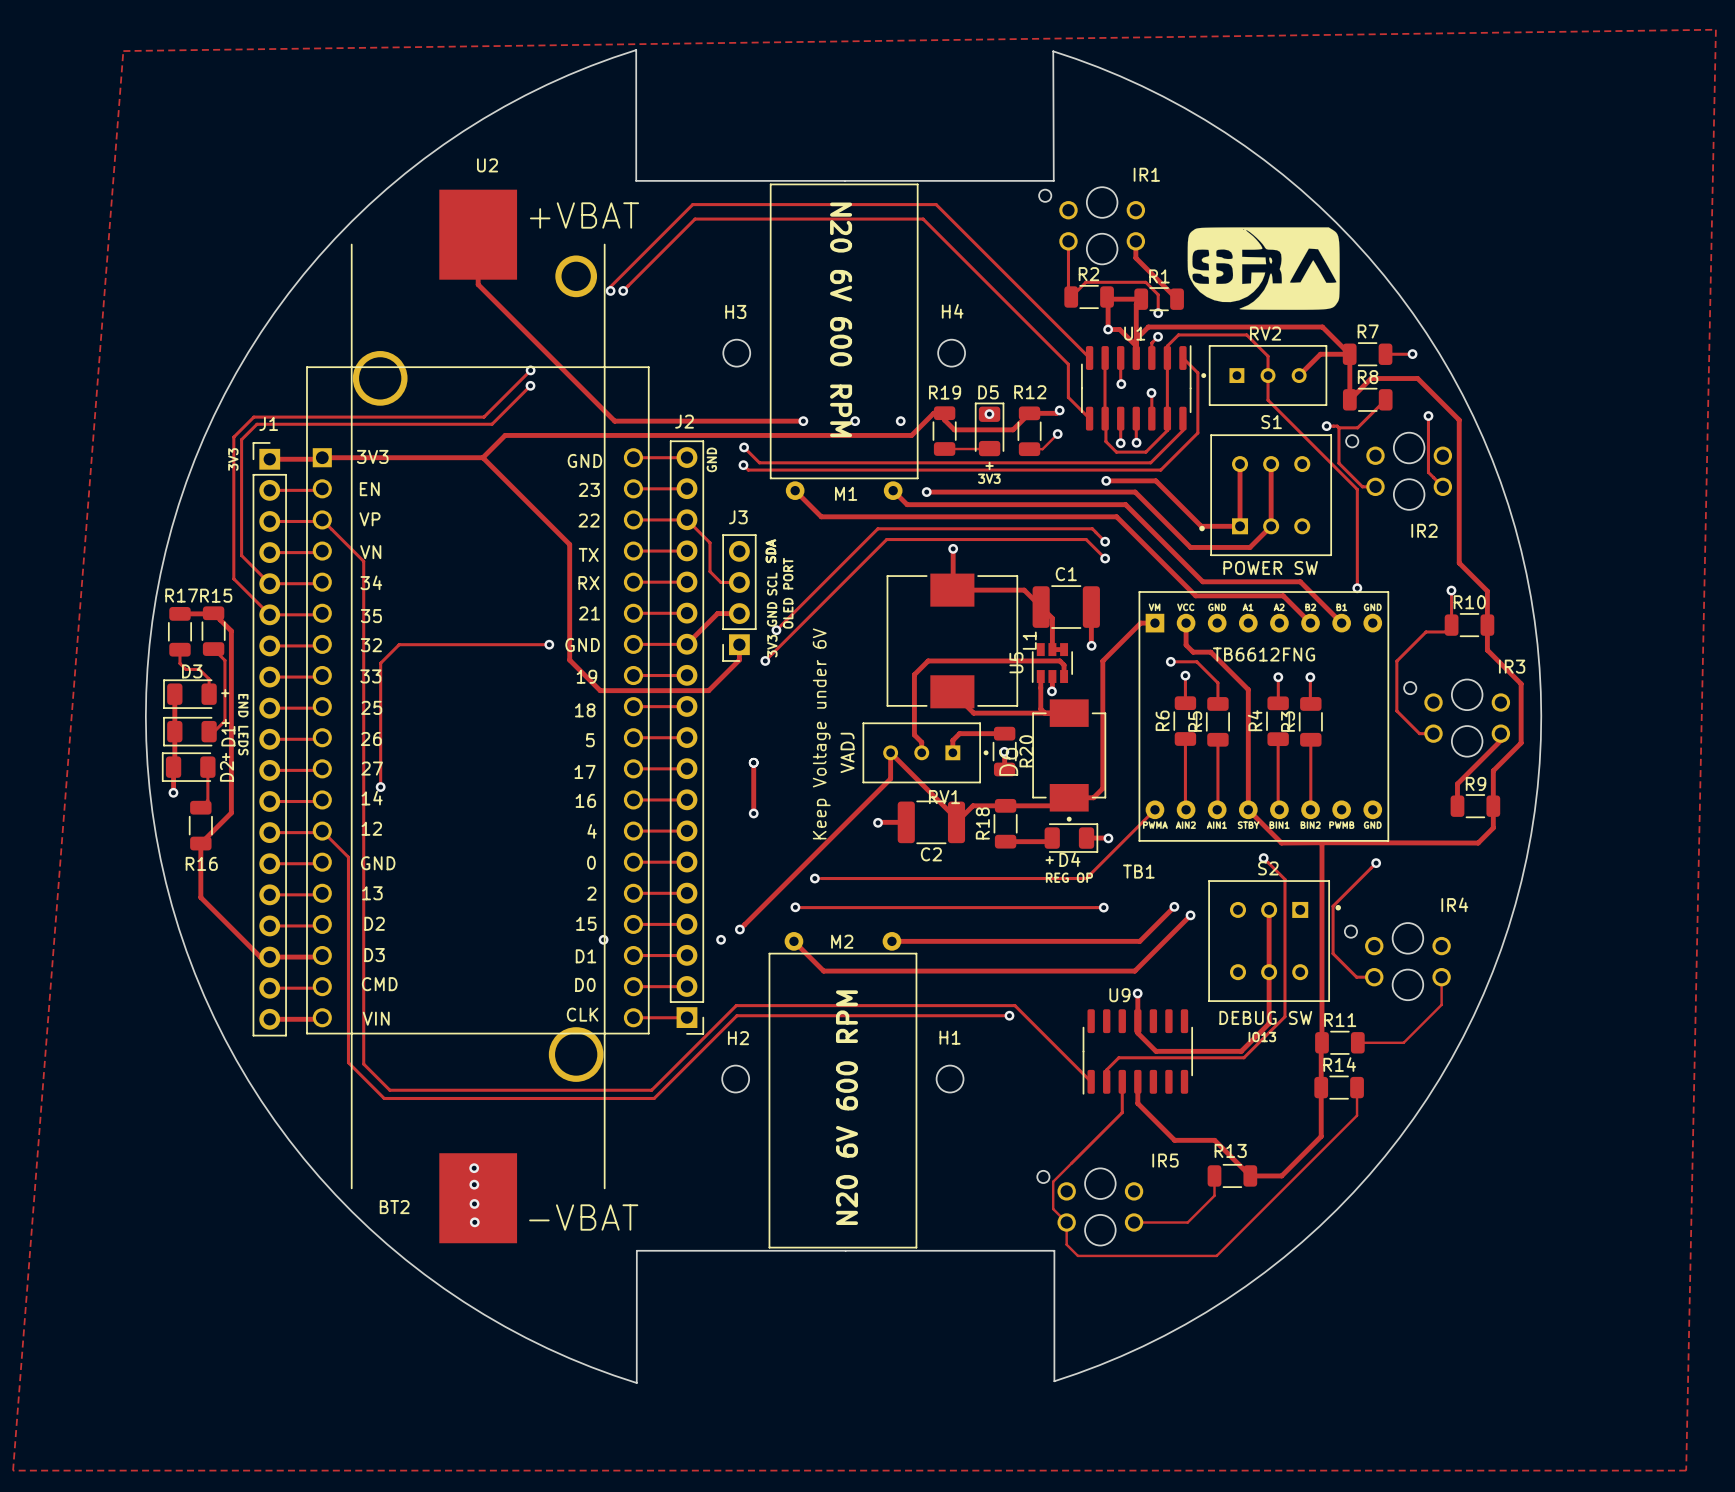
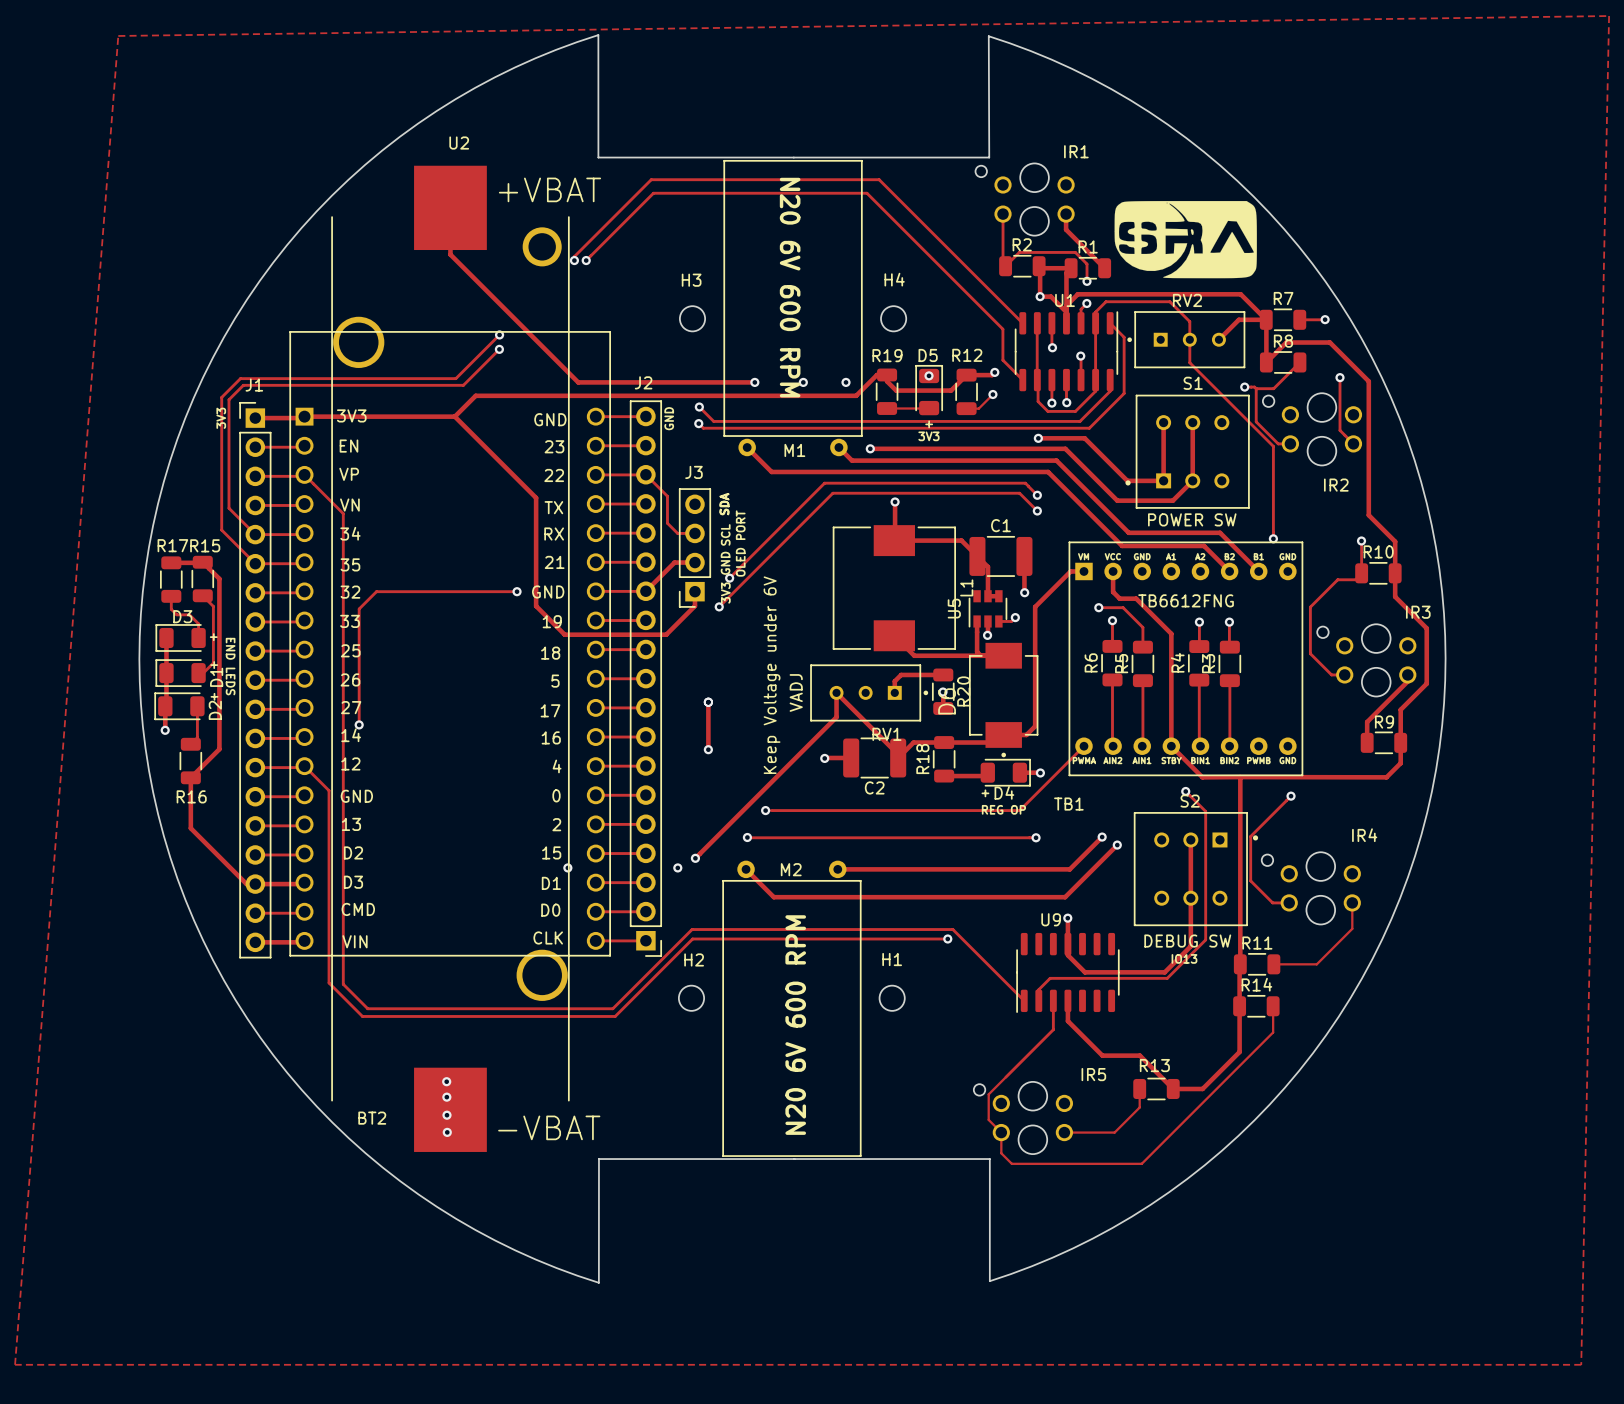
via: none -> (1015, 617)
track: (1064, 676) (1064, 665) (1059, 660) (928, 660) (914, 674) (914, 734) (921, 742) (921, 752) -> (998, 621) (1011, 621) (1015, 617)

